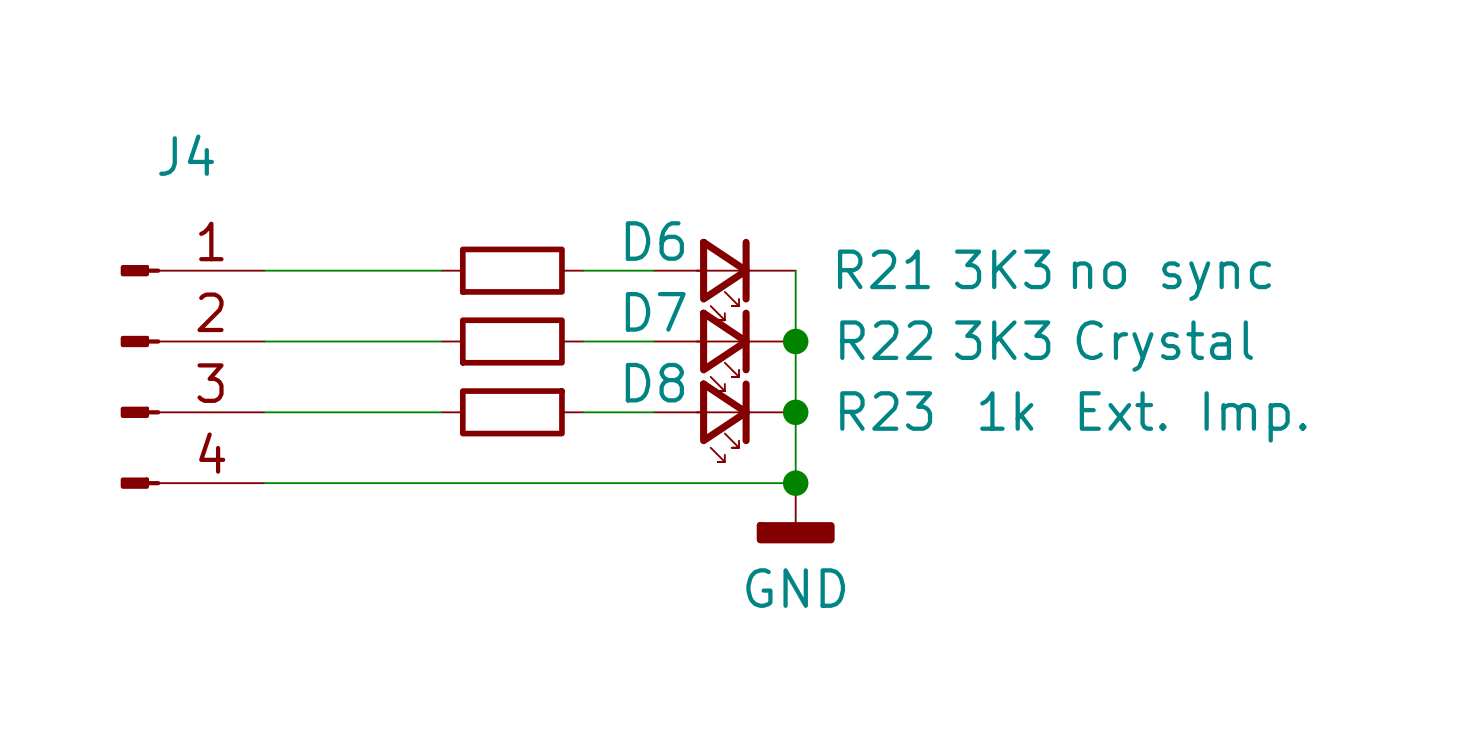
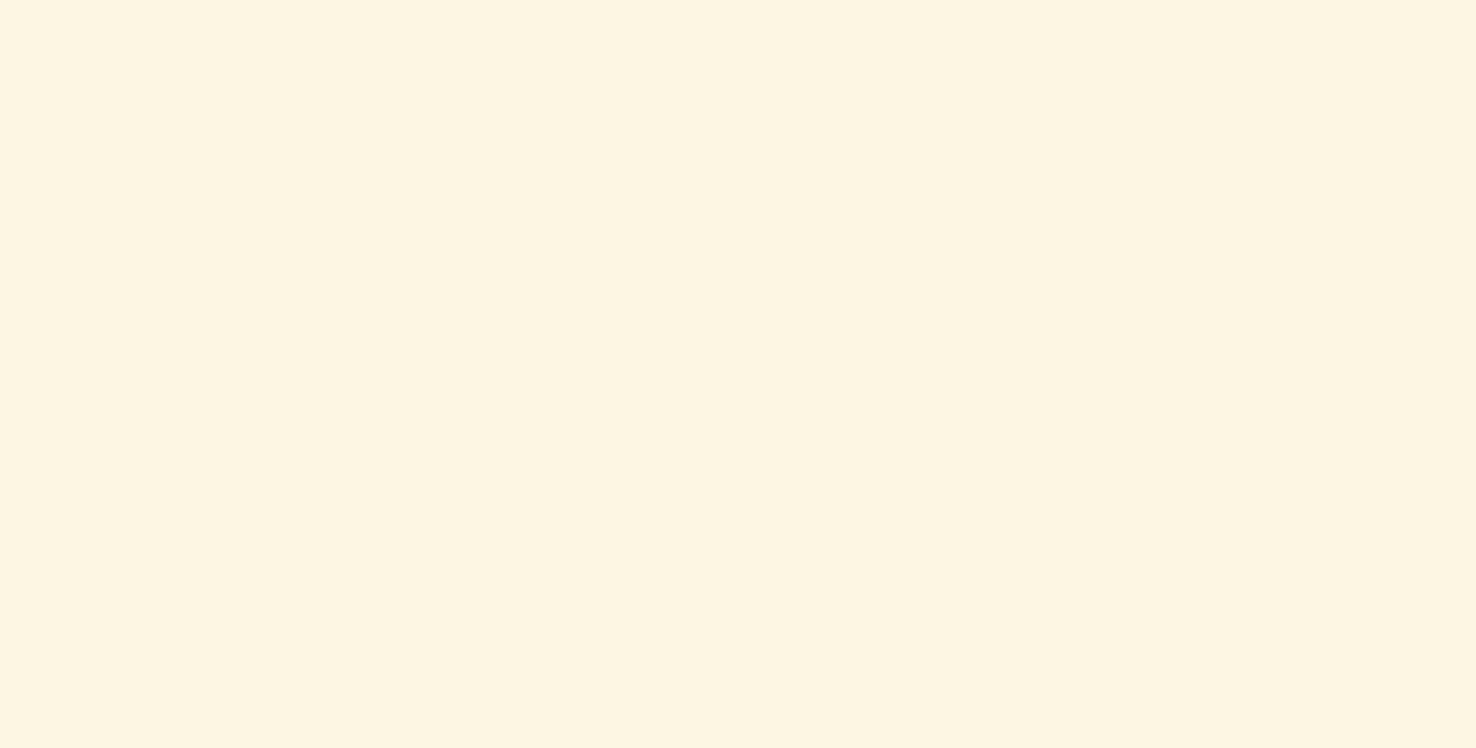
wire: (264, 270) (441, 270) -> none
R21: 3K3 (512, 270) -> none
wire: (583, 270) (654, 270) -> none
wire: (795, 270) (795, 483) (264, 483) -> none
D6: no sync (724, 279) -> none
wire: (264, 341) (441, 341) -> none
R22: 3K3 (512, 341) -> none
wire: (583, 341) (654, 341) -> none
junction: (795, 341) -> none
D7: Crystal (724, 350) -> none
J4: (192, 376) -> none
wire: (264, 412) (441, 412) -> none
R23: 1k (512, 412) -> none
wire: (583, 412) (654, 412) -> none
junction: (795, 412) -> none
D8: Ext. Imp. (724, 421) -> none
junction: (795, 483) -> none
power symbol: GND (795, 513) -> none

